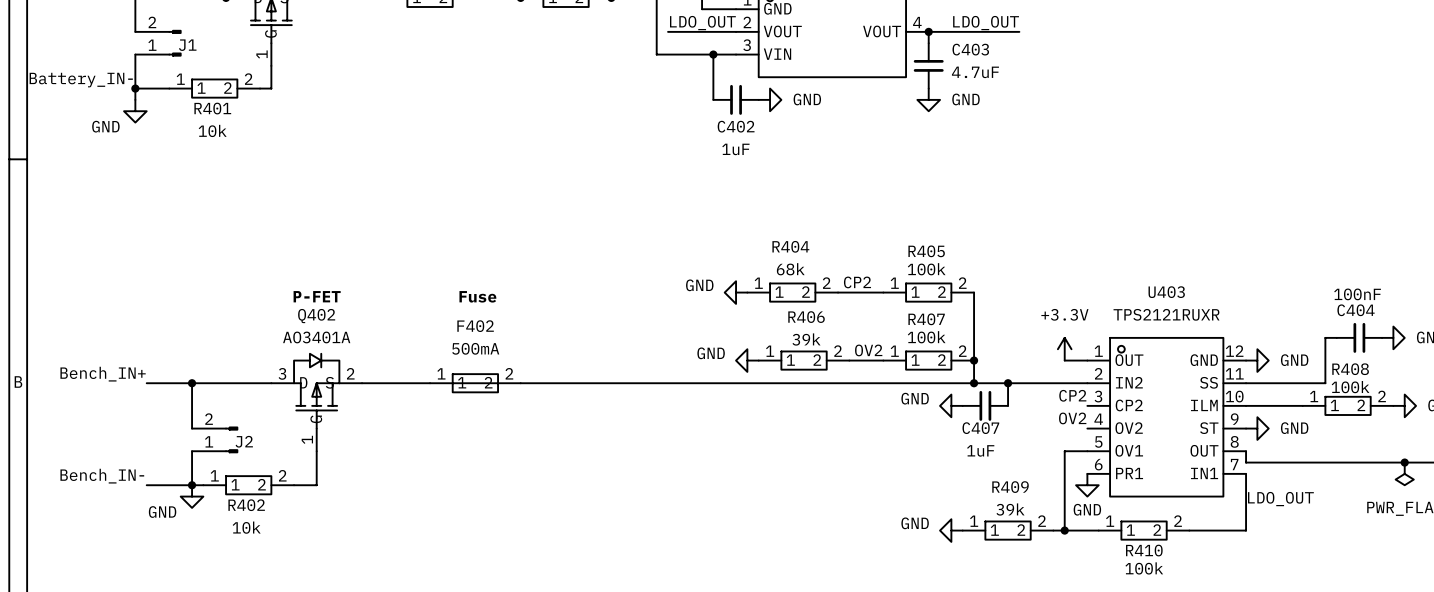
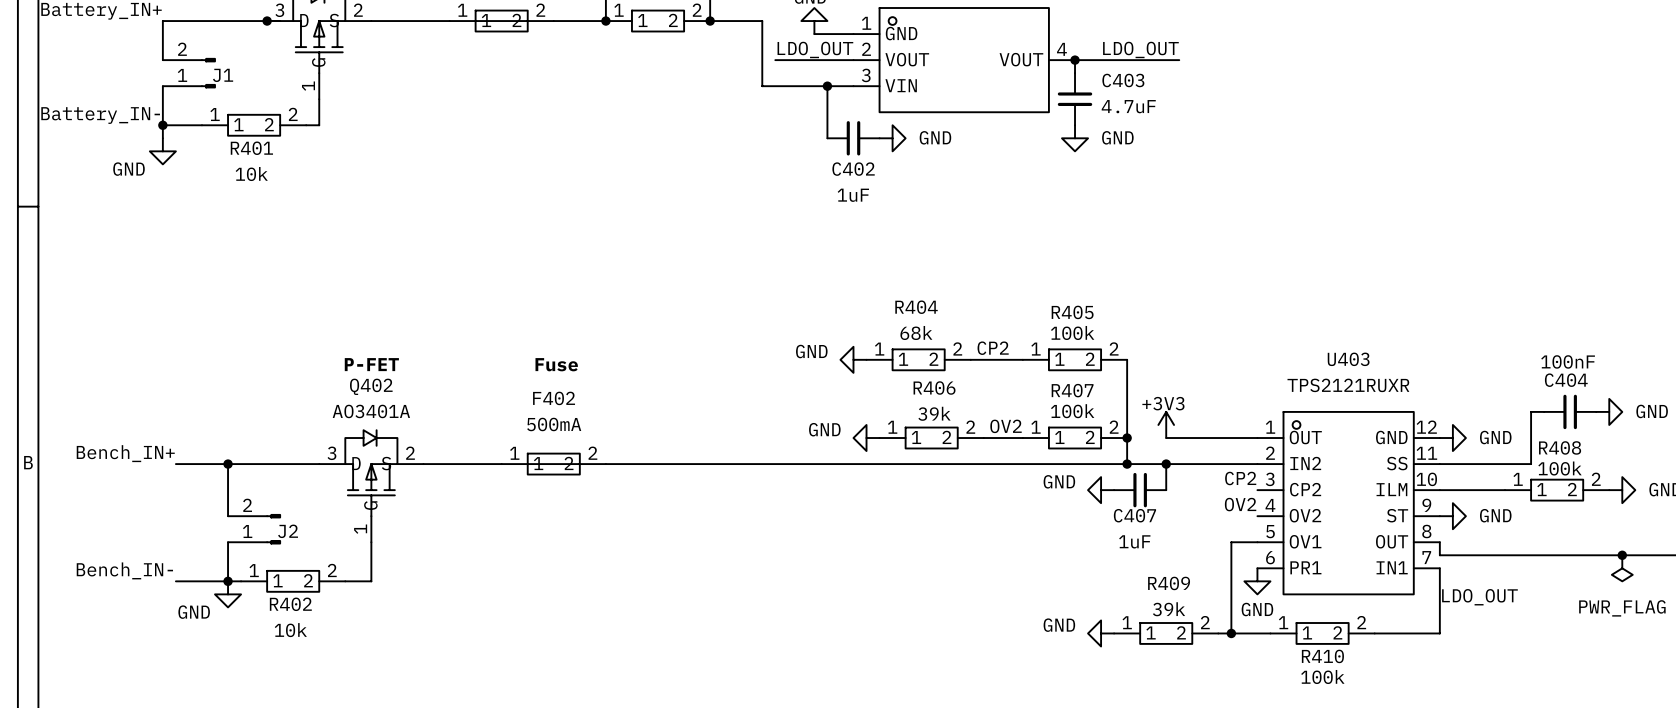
power symbol: none -> +3V3 (1166, 424)
power symbol: +3.3V (1064, 349) -> none
wire: none -> (1166, 438) (1231, 438)

